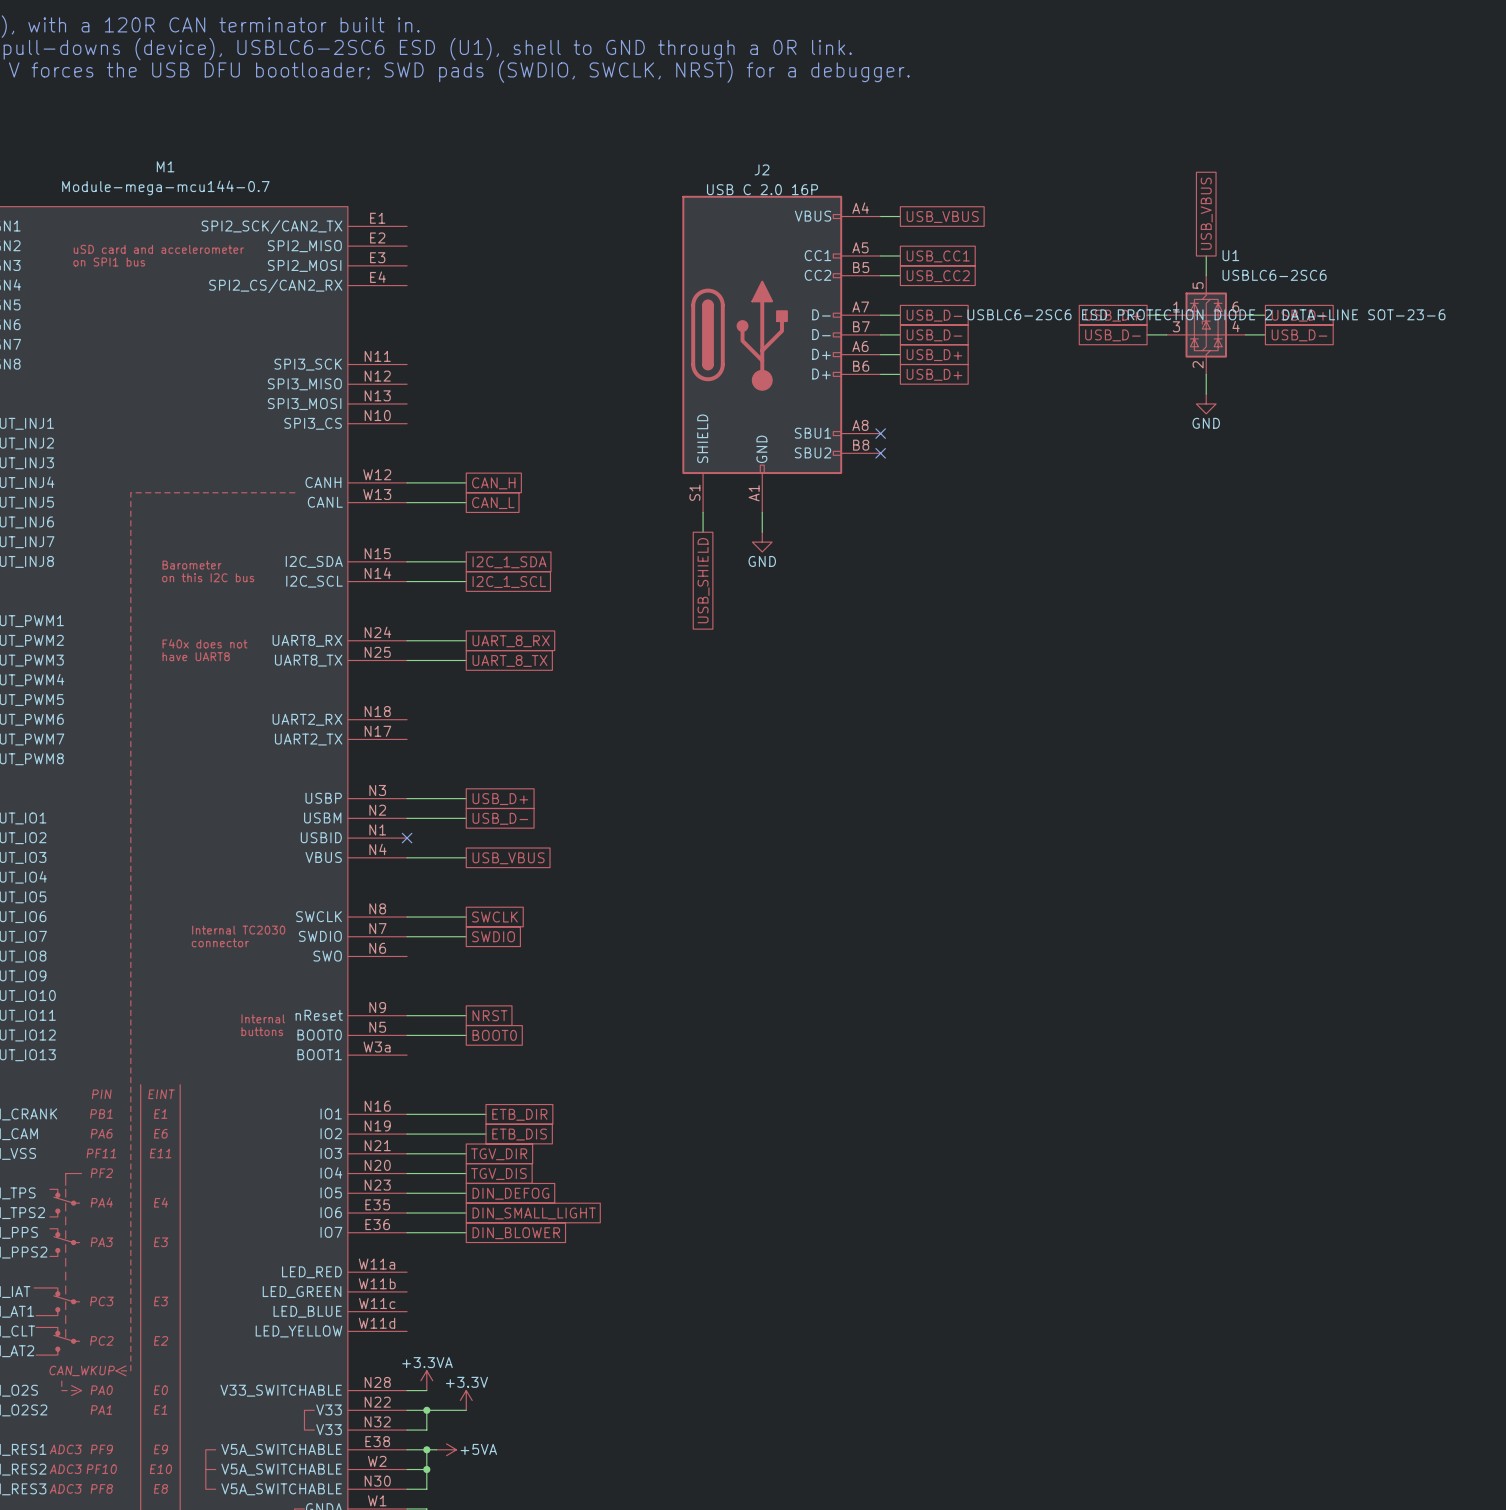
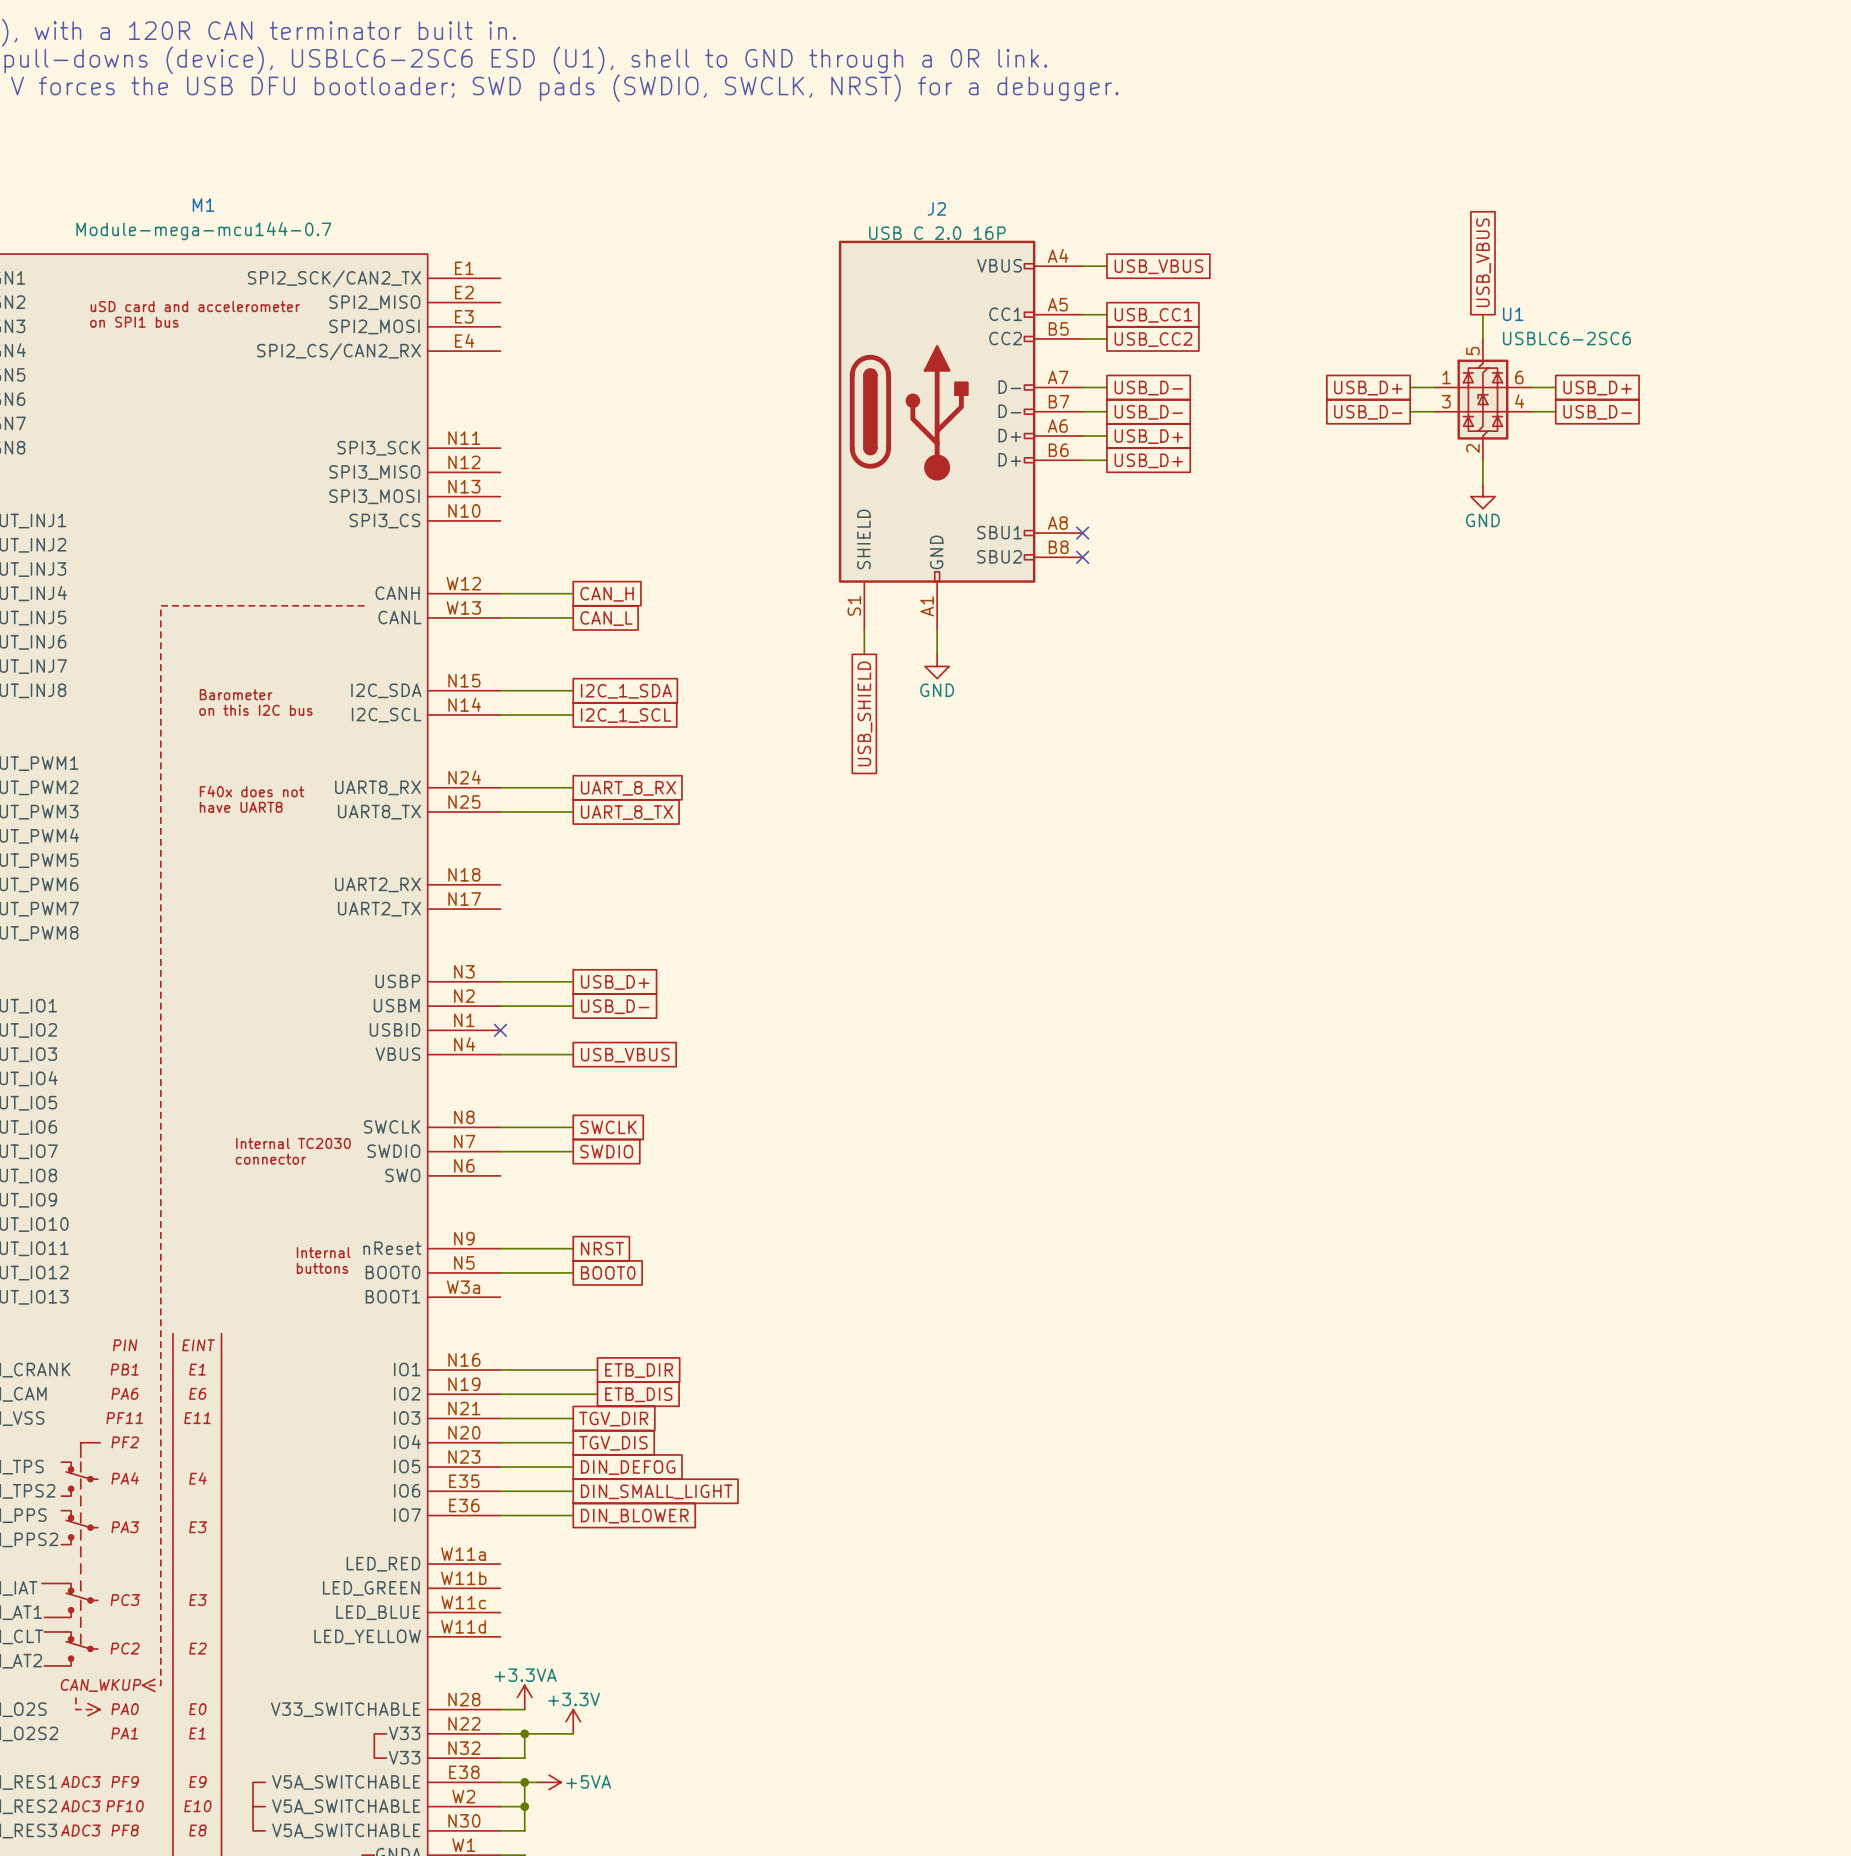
U1 text: USBLC6-2SC6 ESD PROTECTION DIODE 2 DATA-LINE SOT-23-6 (1206, 314) -> none

